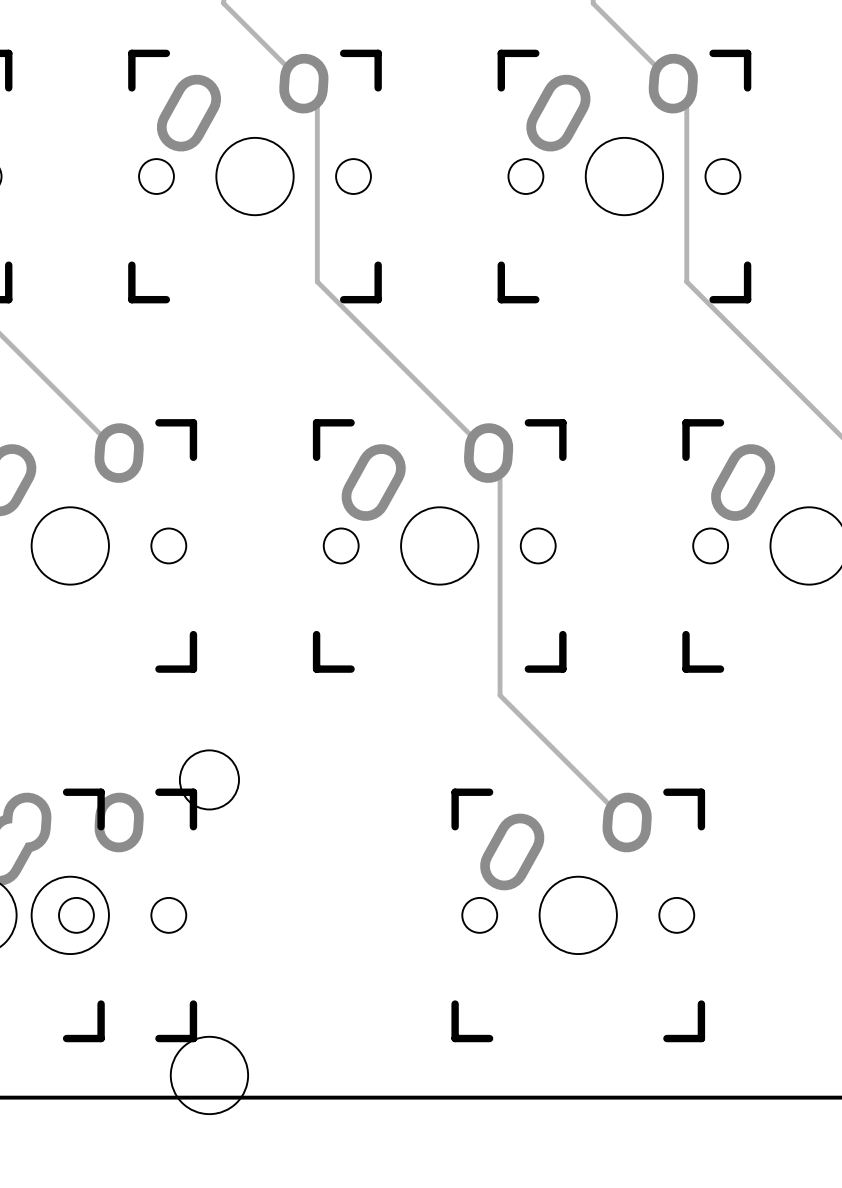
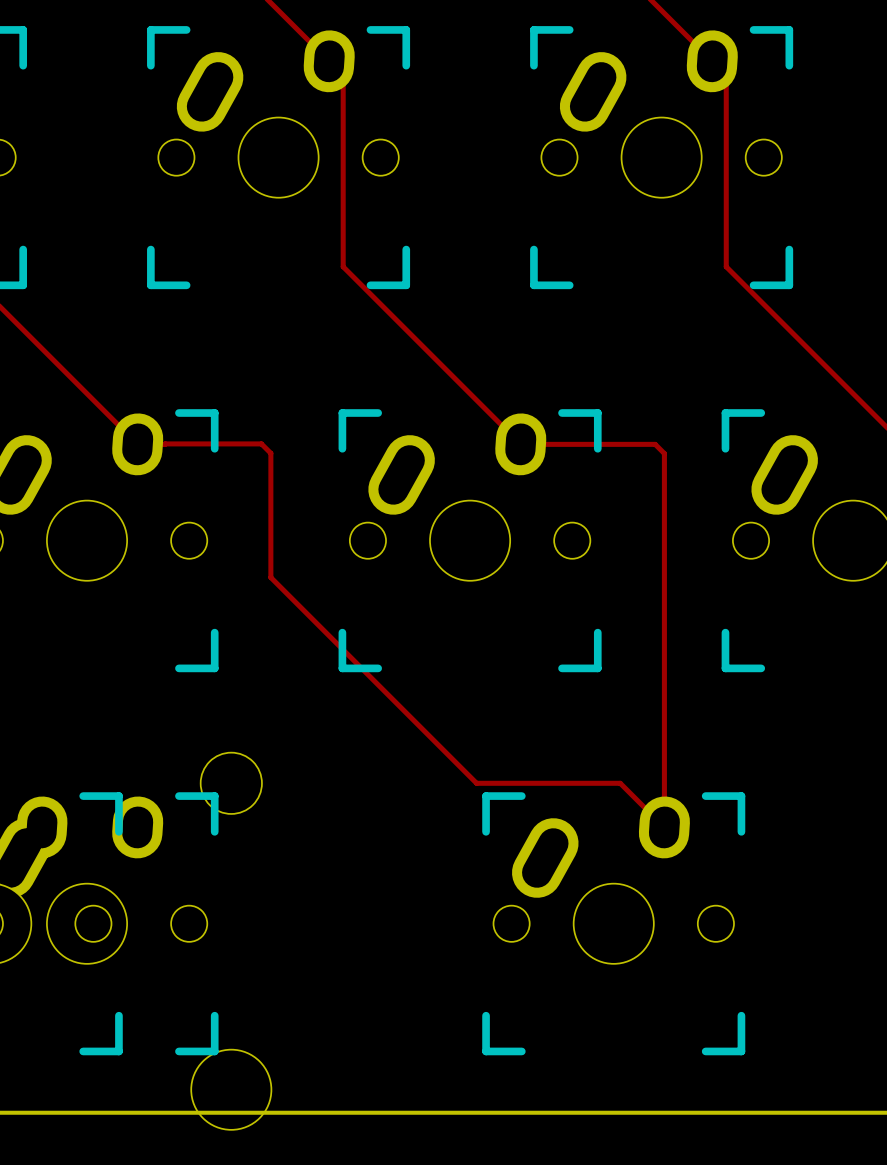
track: none -> (137, 444) (261, 443) (270, 453) (270, 577) (476, 783) (620, 783)
track: (488, 453) (500, 464) (500, 695) (584, 779) -> (520, 444) (655, 444) (664, 453) (664, 827)

